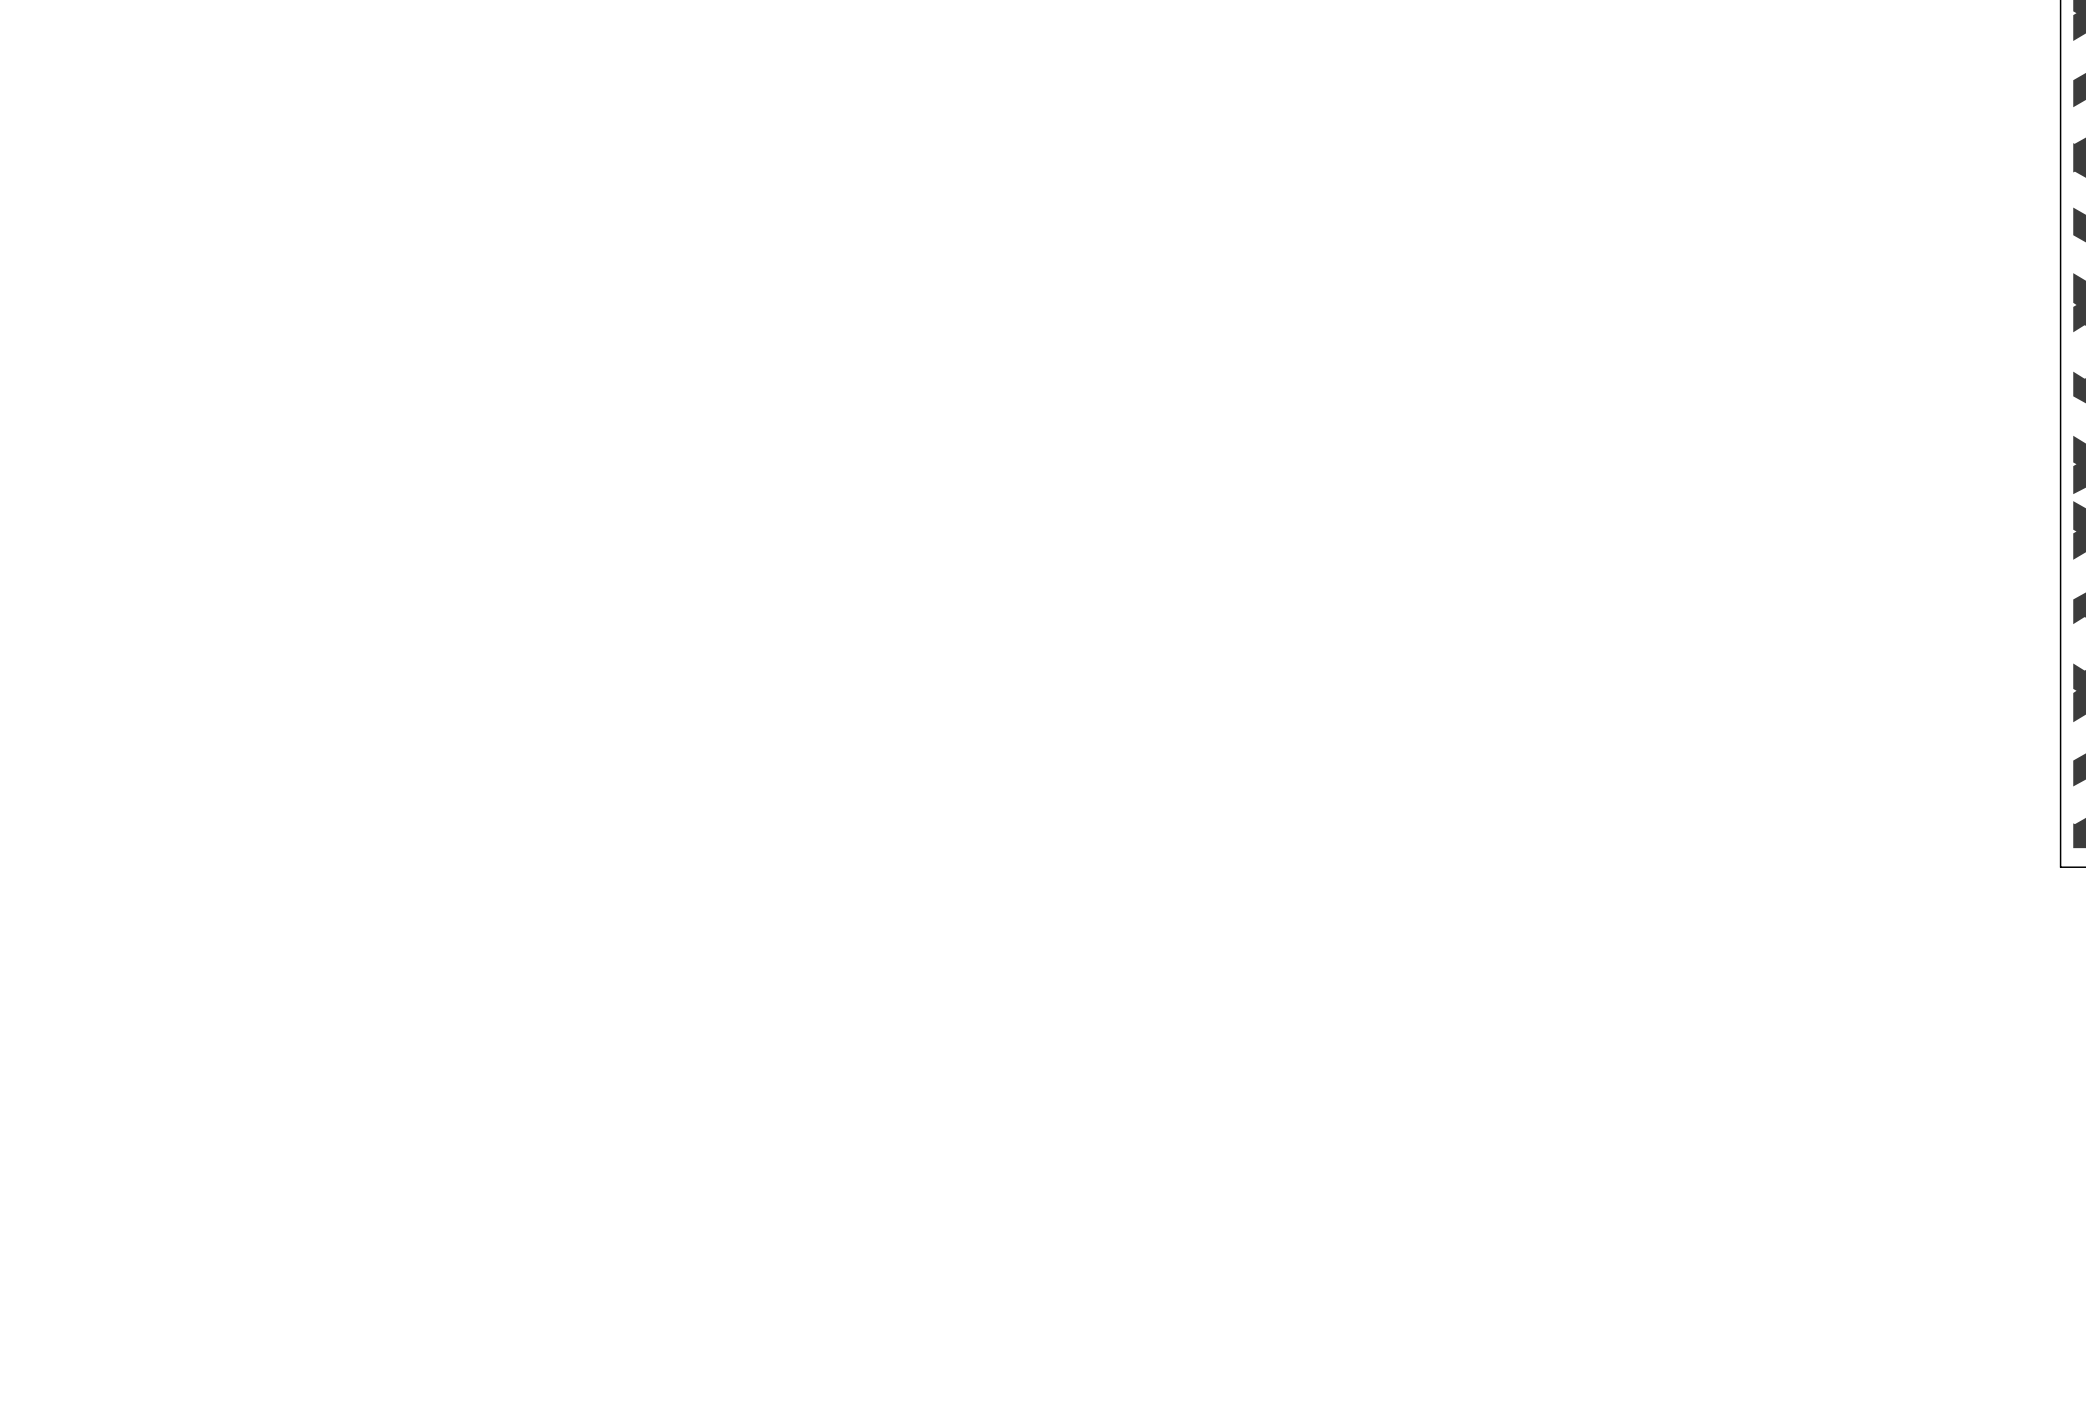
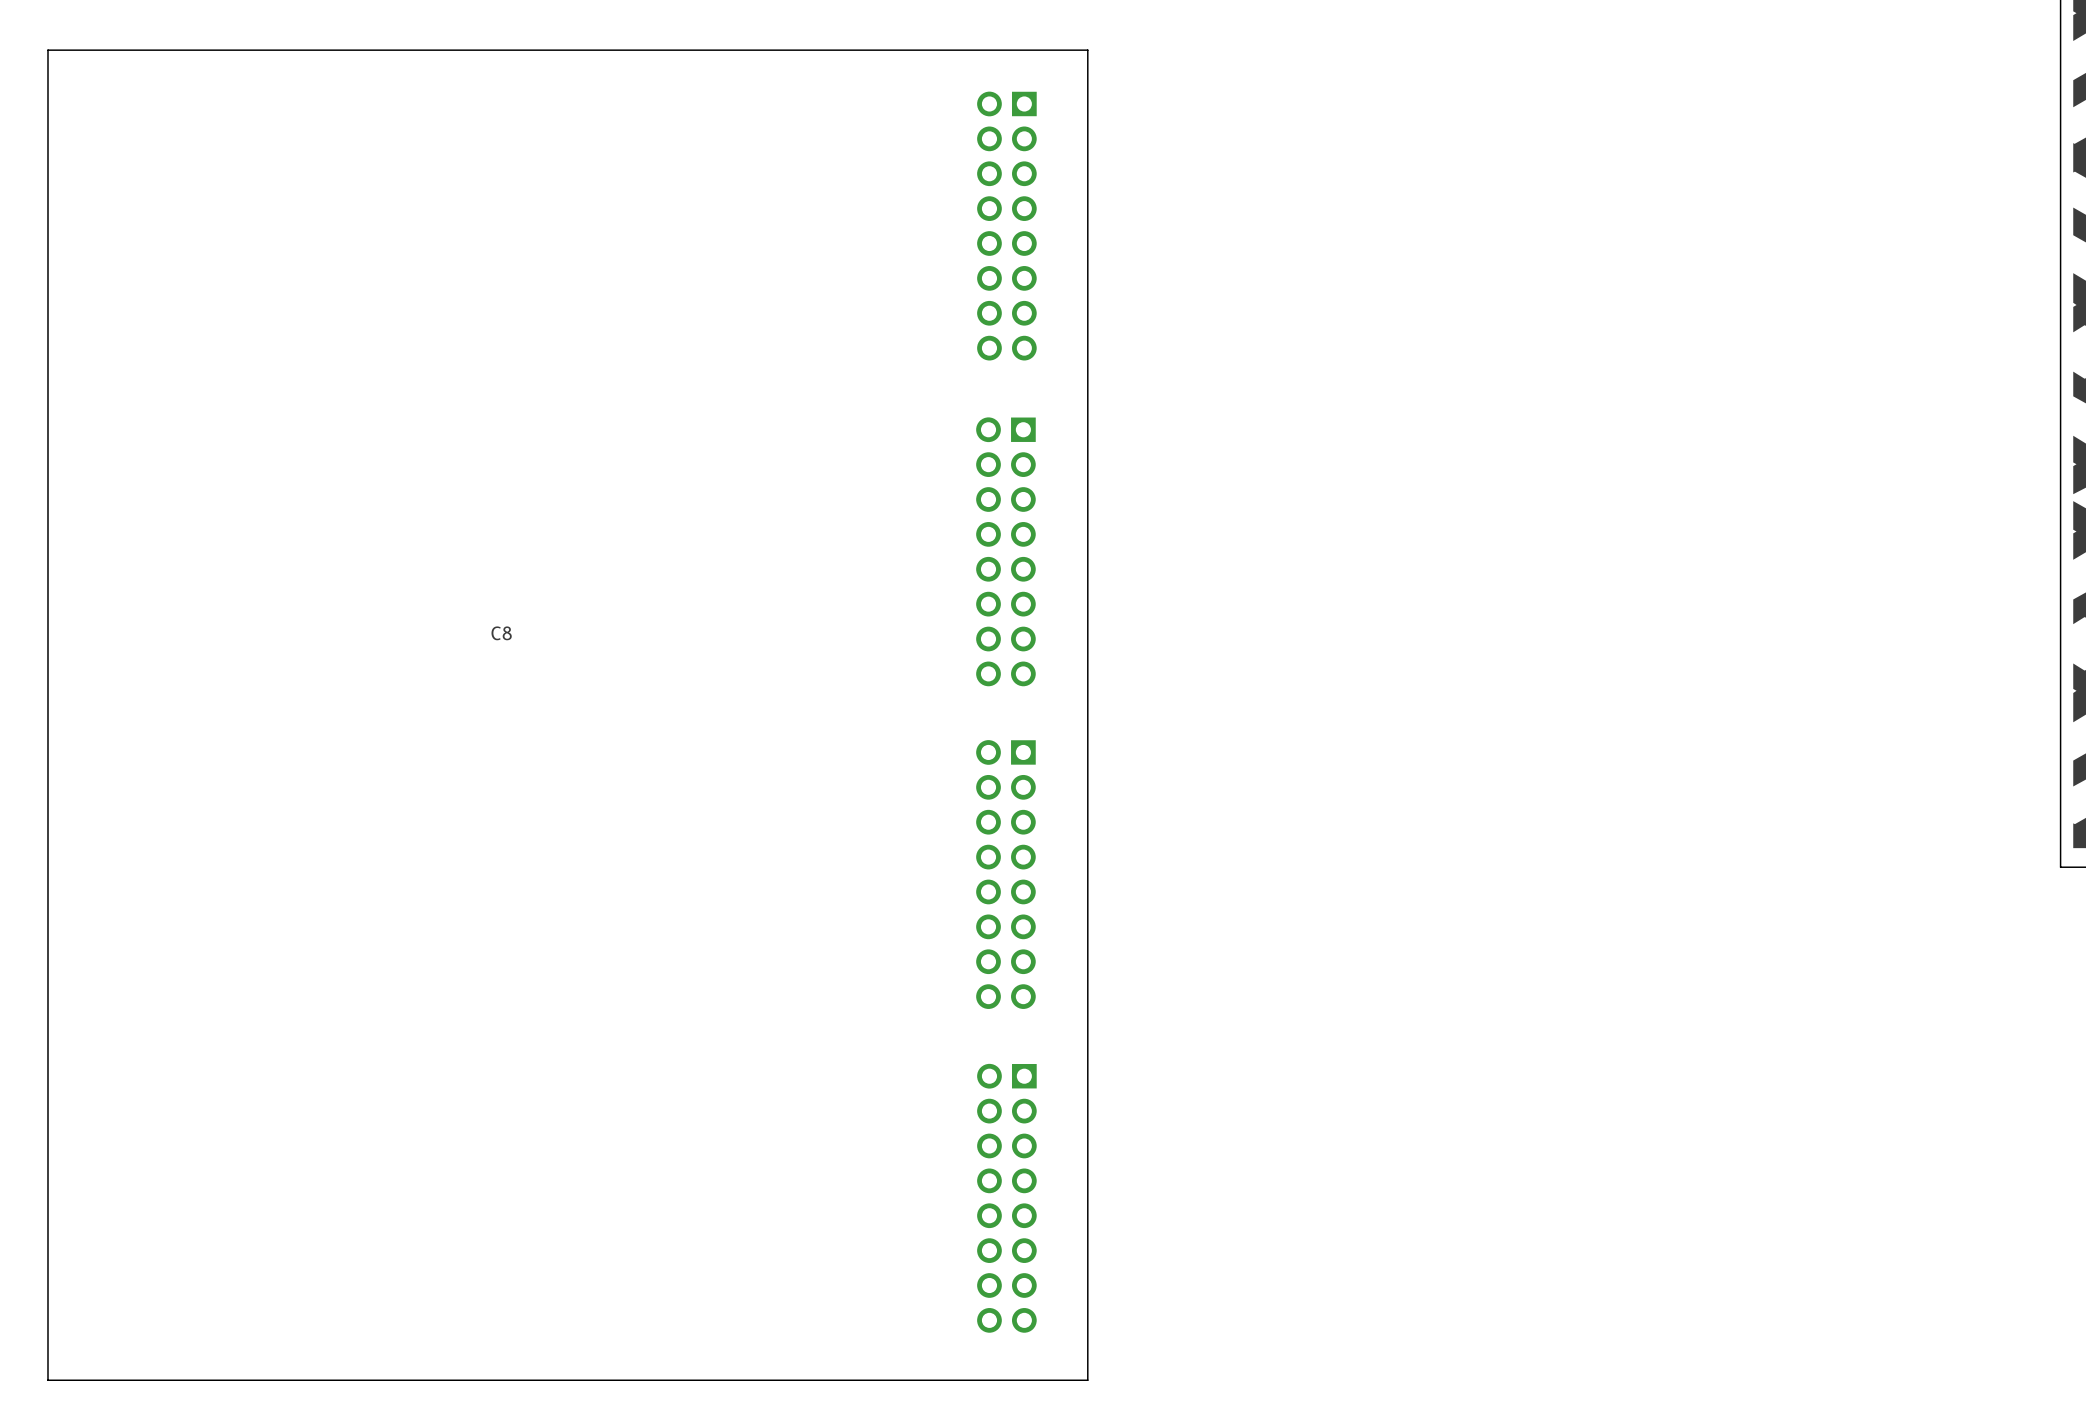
board edge: none -> (1087, 50) (47, 50) (47, 1380) (1087, 1380) (1087, 50)
part: none -> (1006, 226)
part: none -> (1005, 551)
C8: none -> (501, 633)
part: none -> (1005, 874)
part: none -> (1006, 1198)

